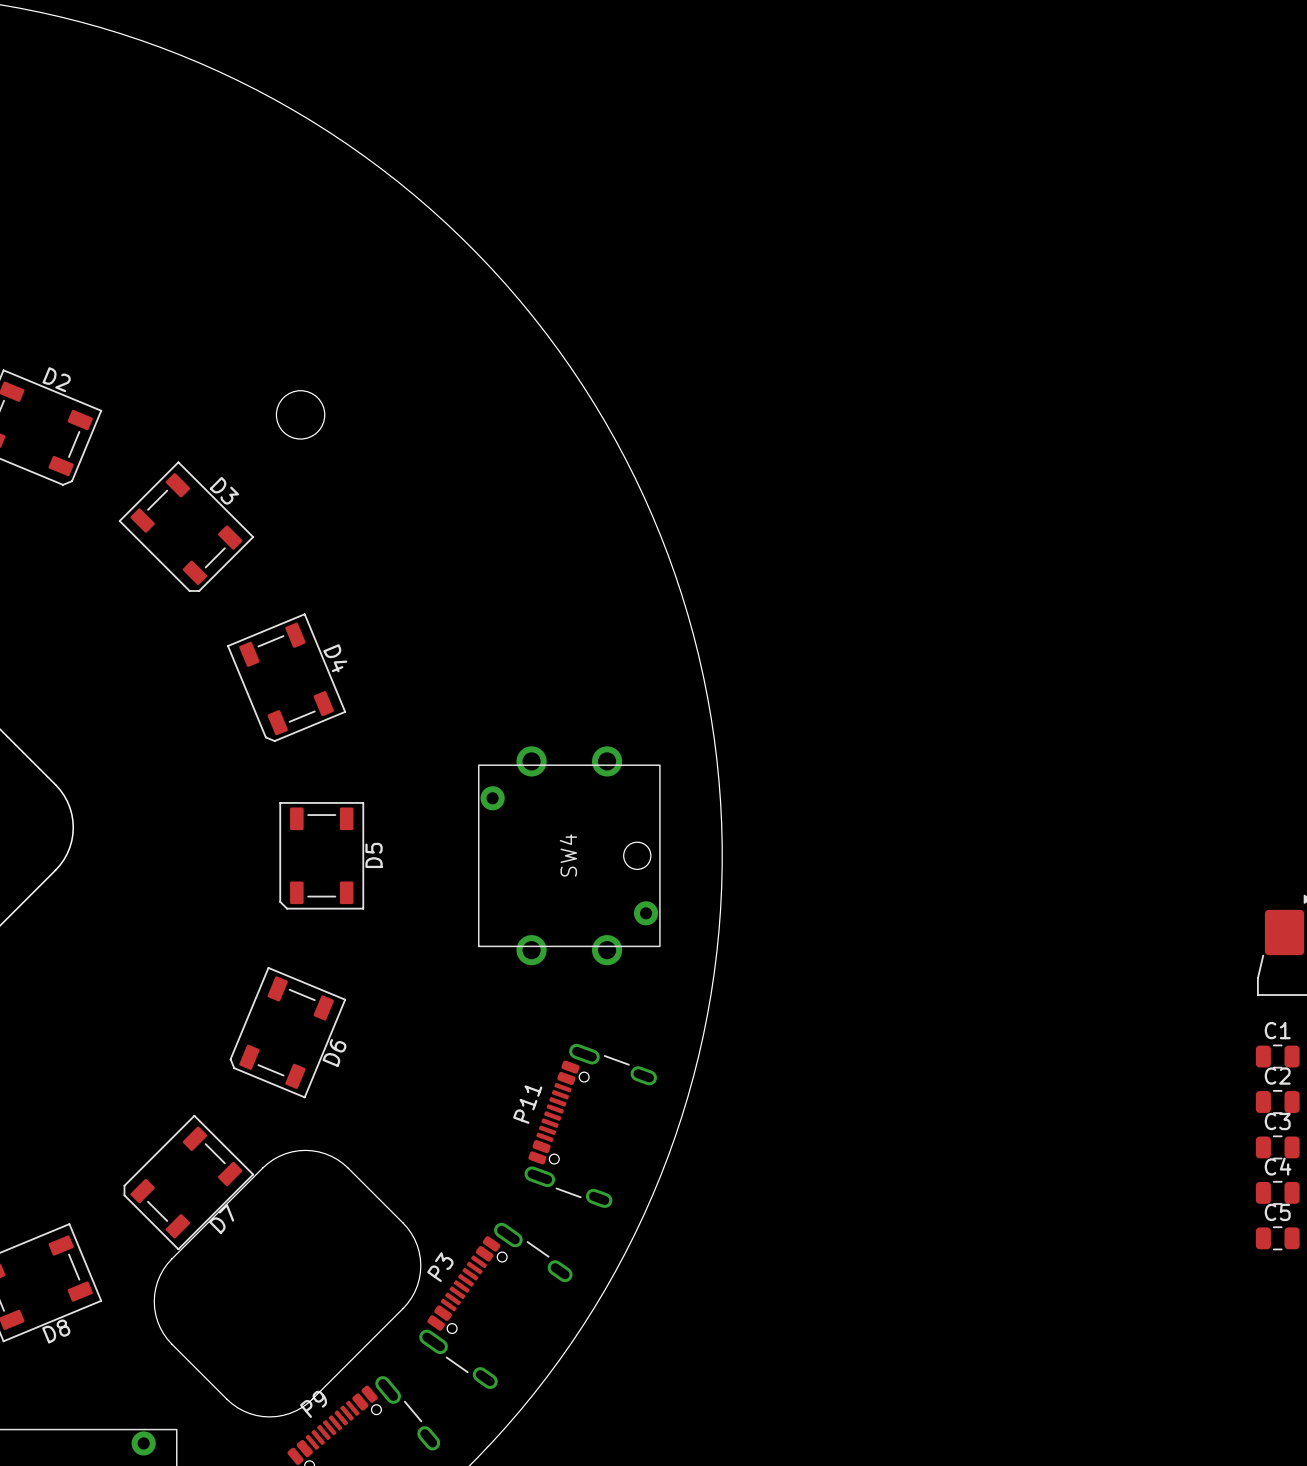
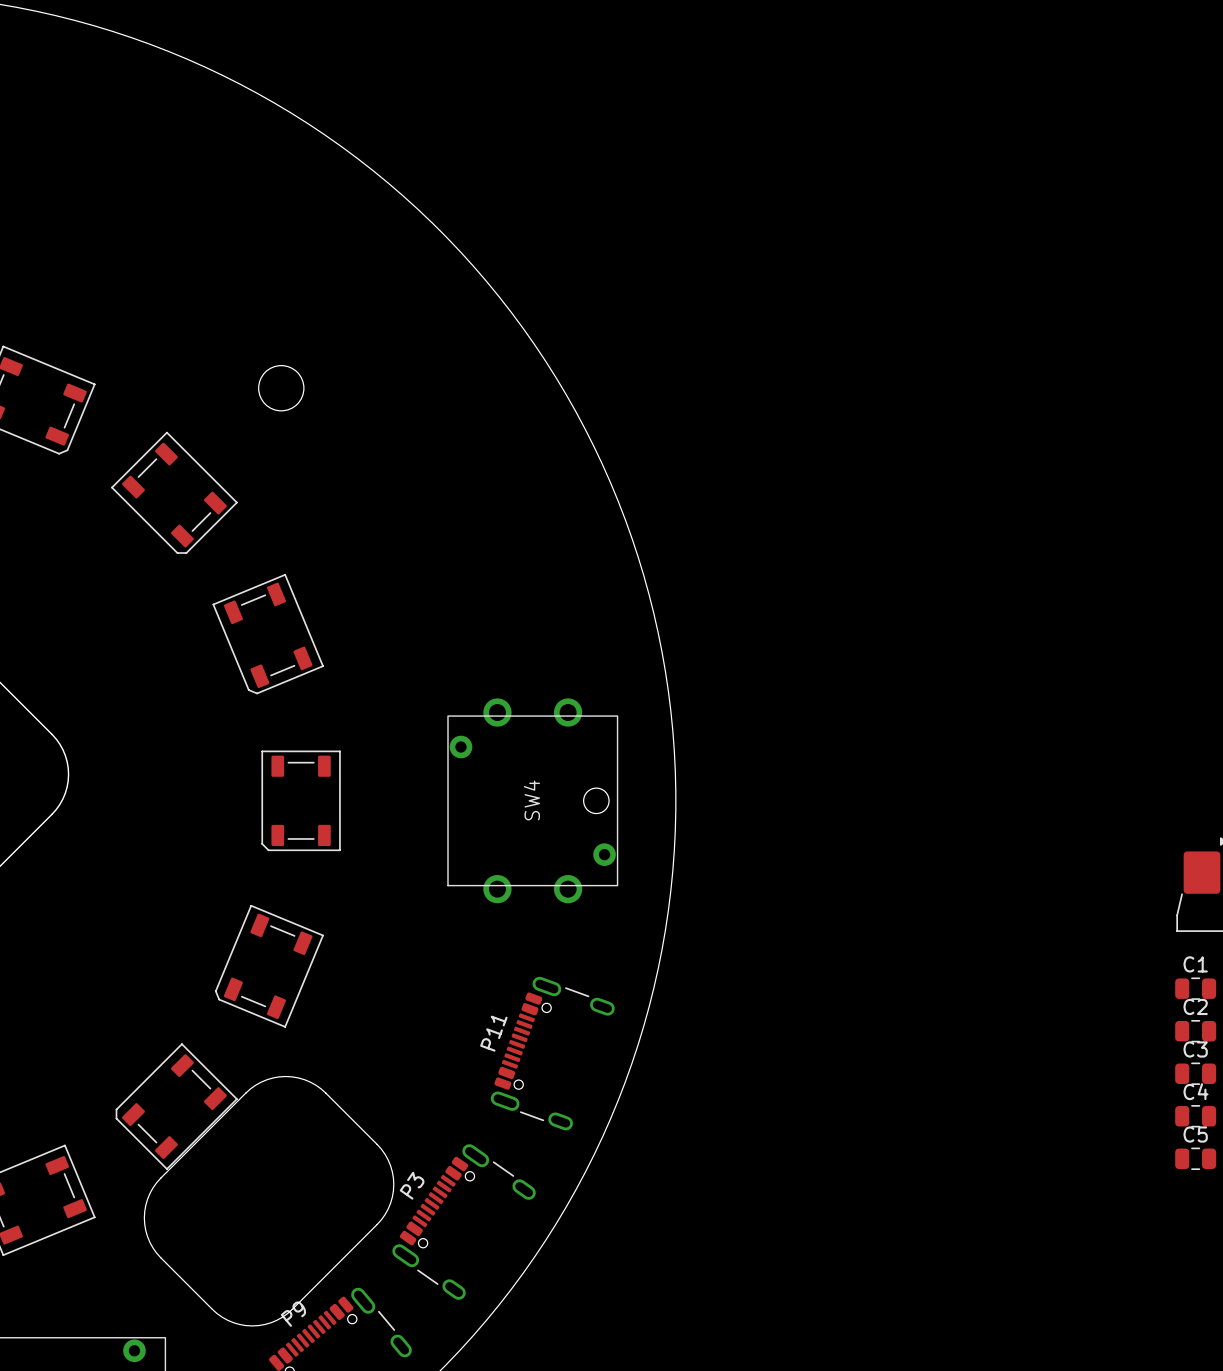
D2 name: D2 (56, 379) -> none
D3 name: D3 (224, 490) -> none
D4 name: D4 (335, 658) -> none
D5 name: D5 (374, 855) -> none
D6 name: D6 (334, 1052) -> none
D7 name: D7 (221, 1219) -> none
D8 name: D8 (56, 1331) -> none

